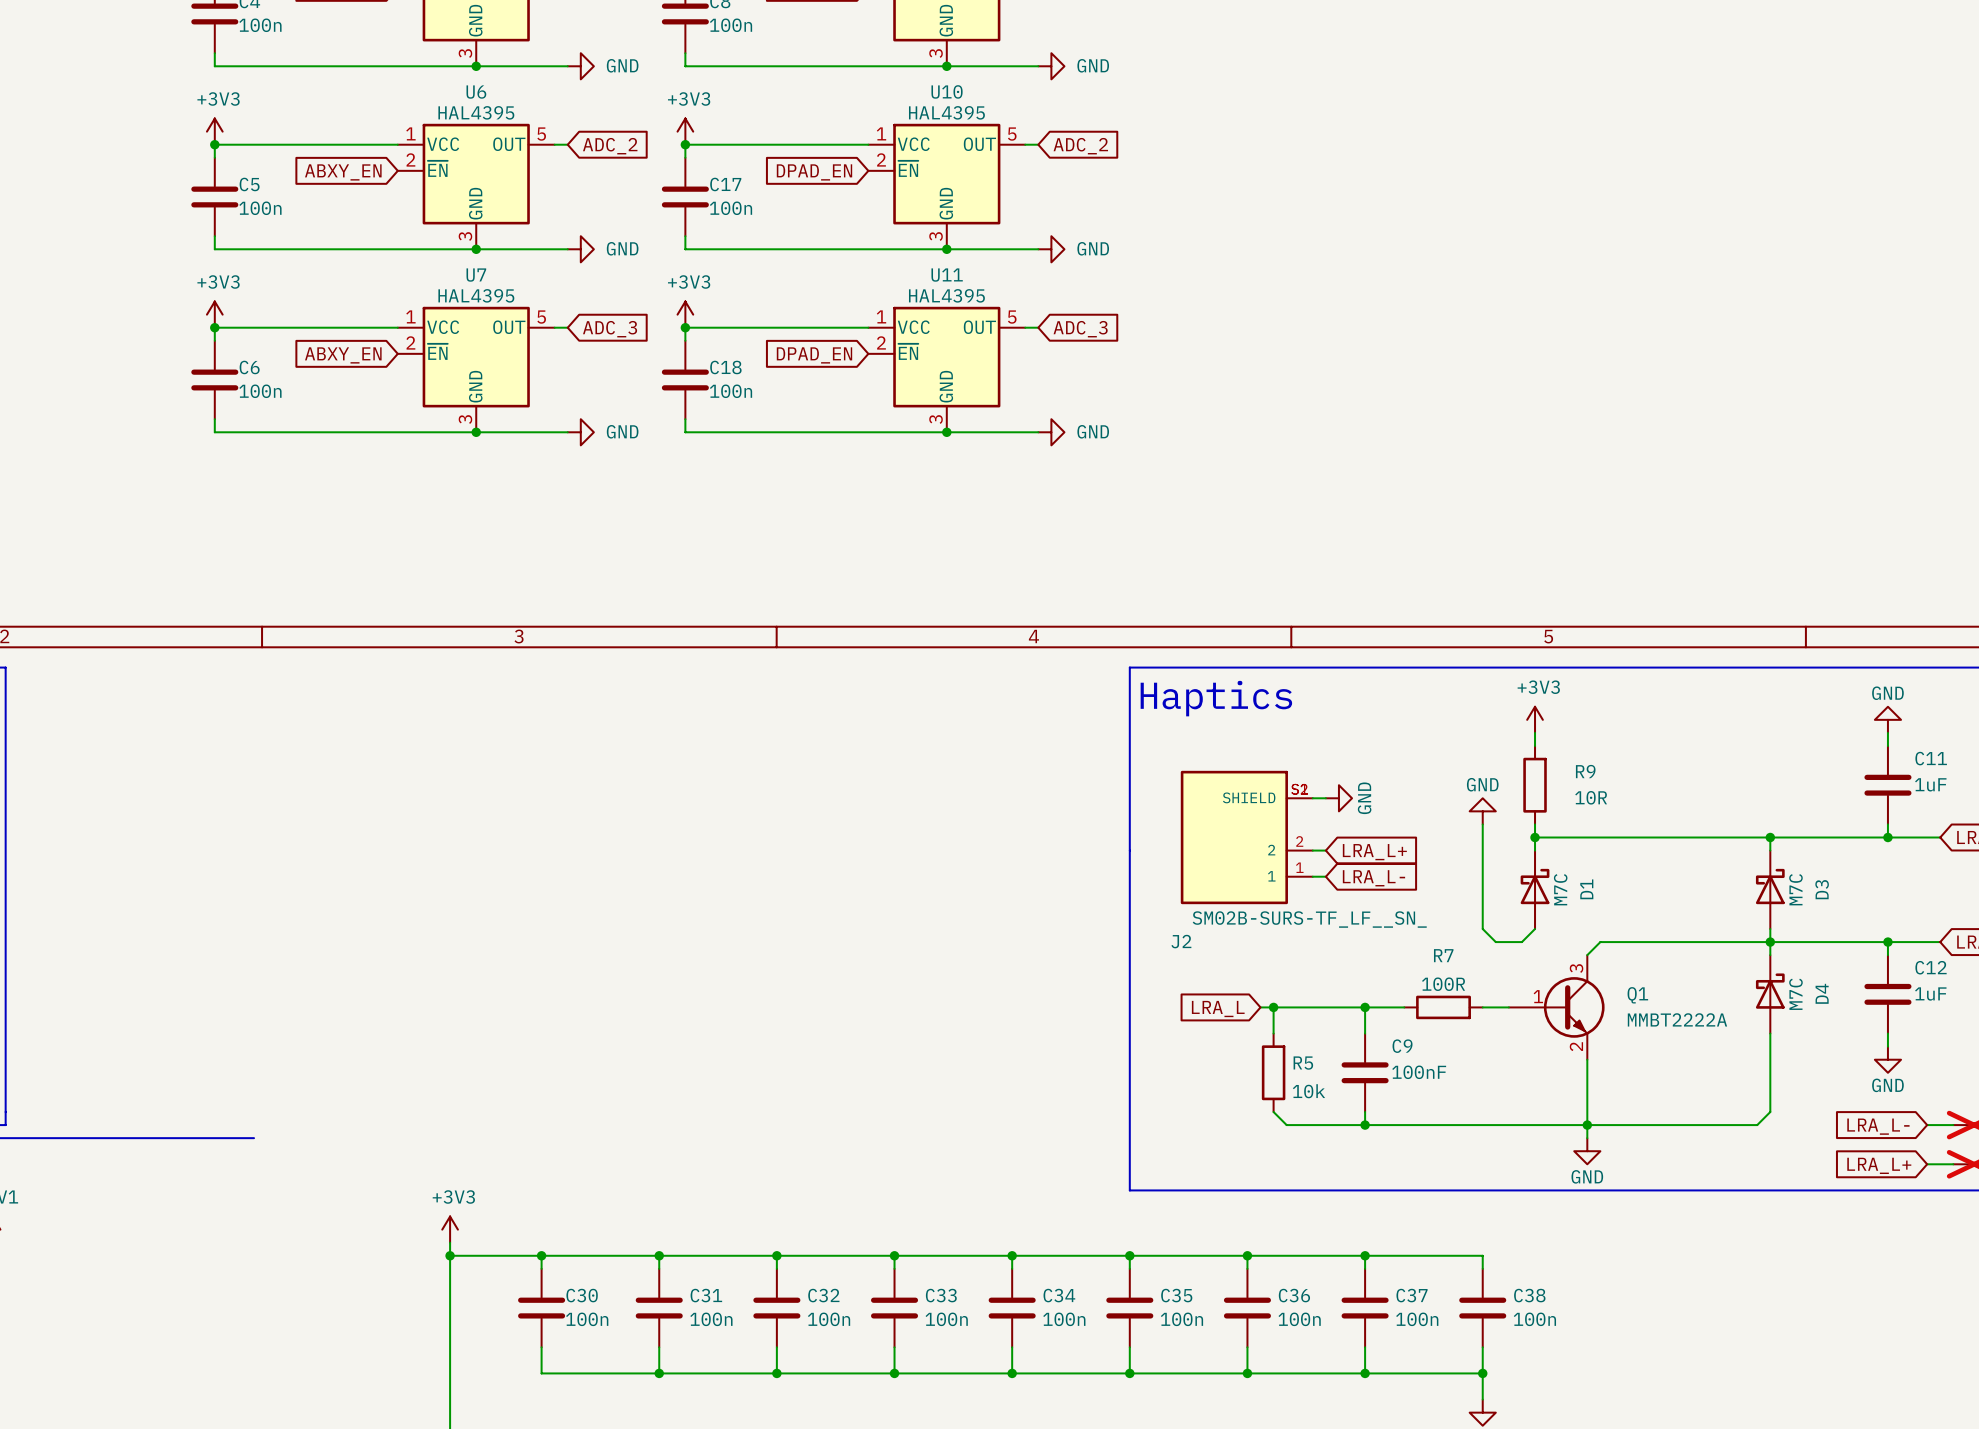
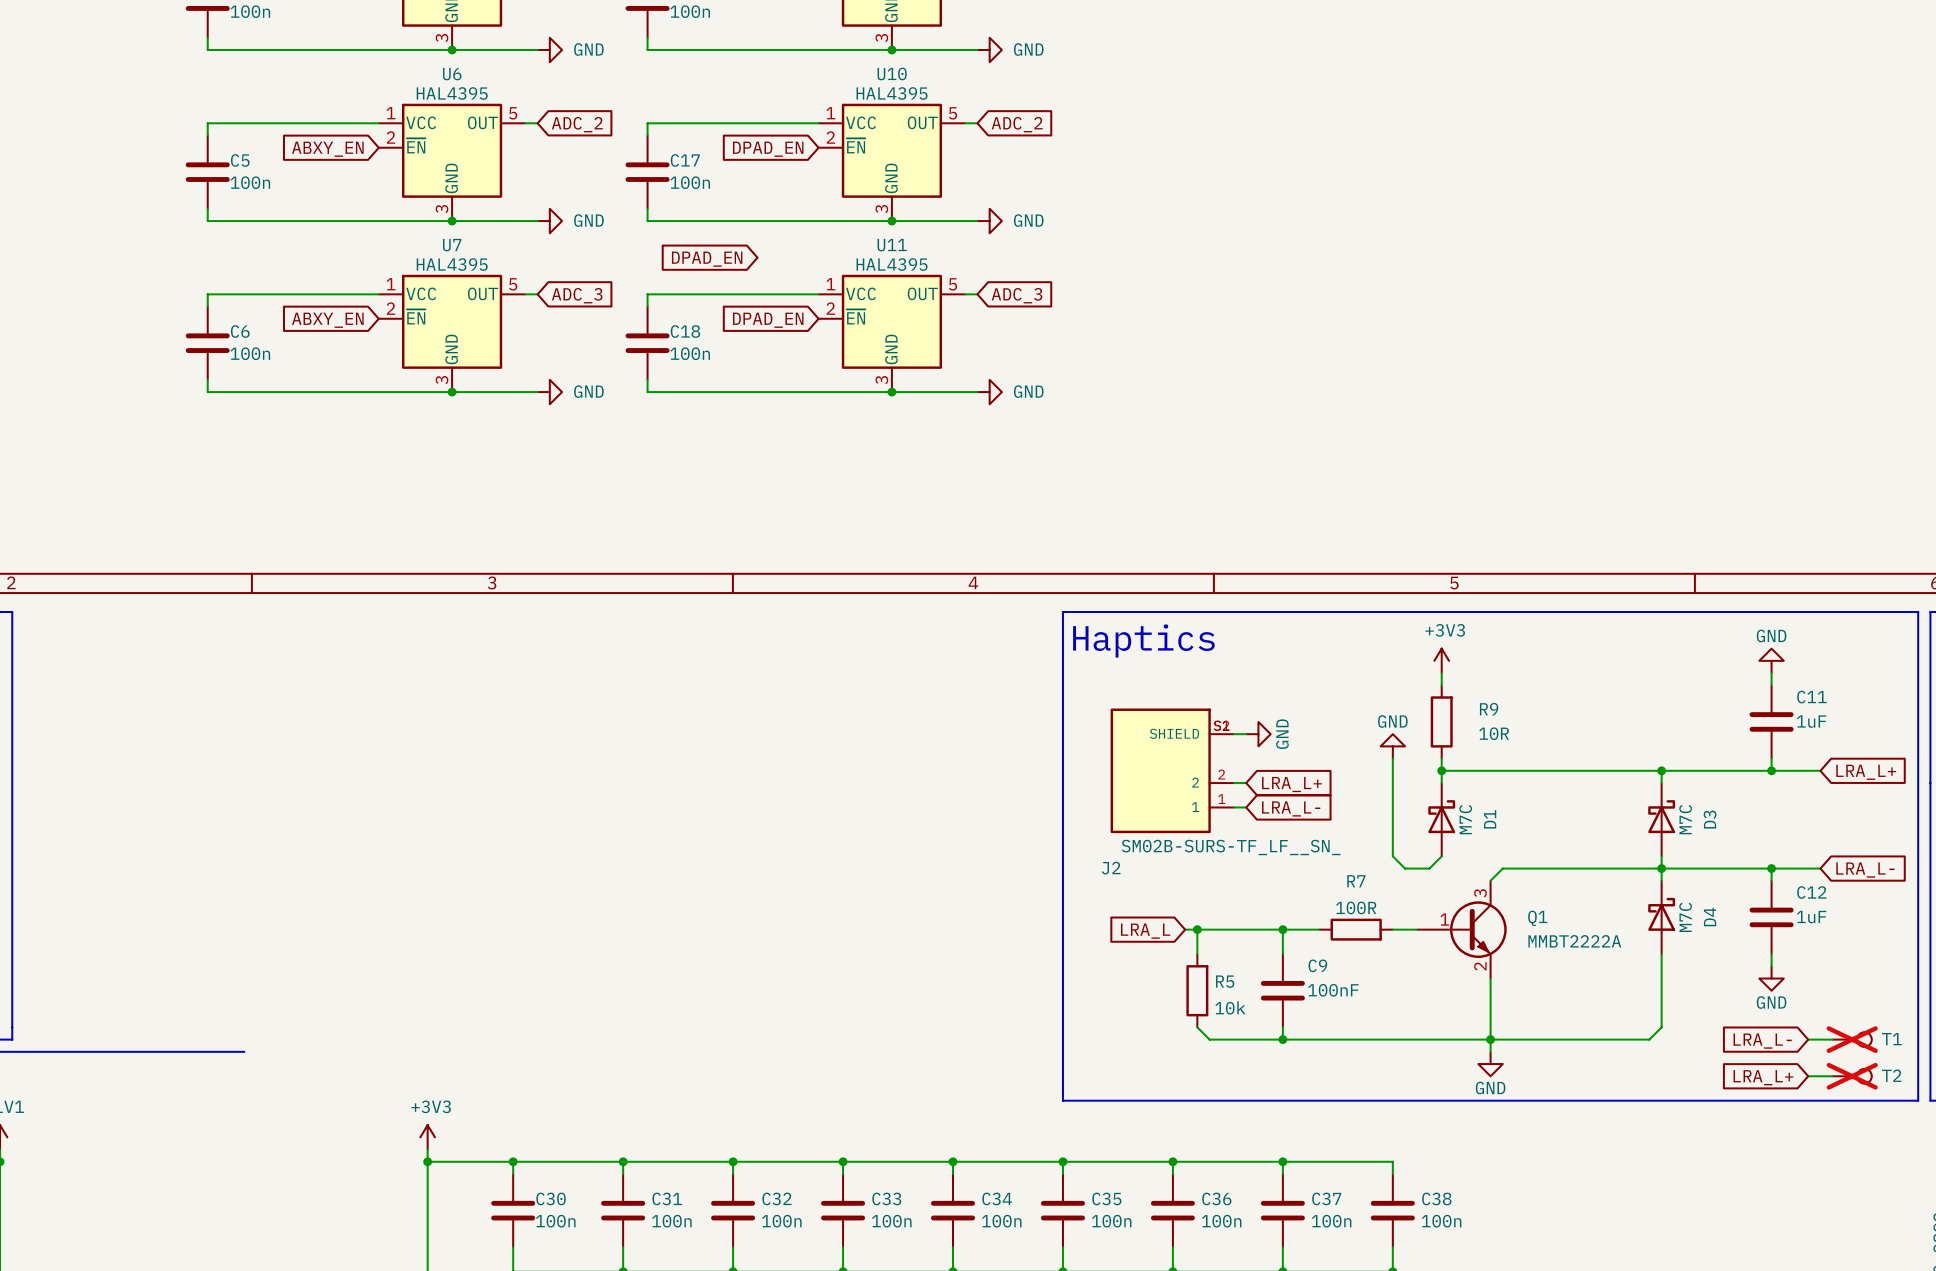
power symbol: +3V3 (214, 131) -> none
power symbol: +3V3 (685, 131) -> none
junction: (214, 144) -> none
junction: (685, 144) -> none
global label: none -> DPAD_EN (707, 259)
power symbol: +3V3 (214, 314) -> none
power symbol: +3V3 (685, 314) -> none
junction: (214, 327) -> none
junction: (685, 327) -> none

